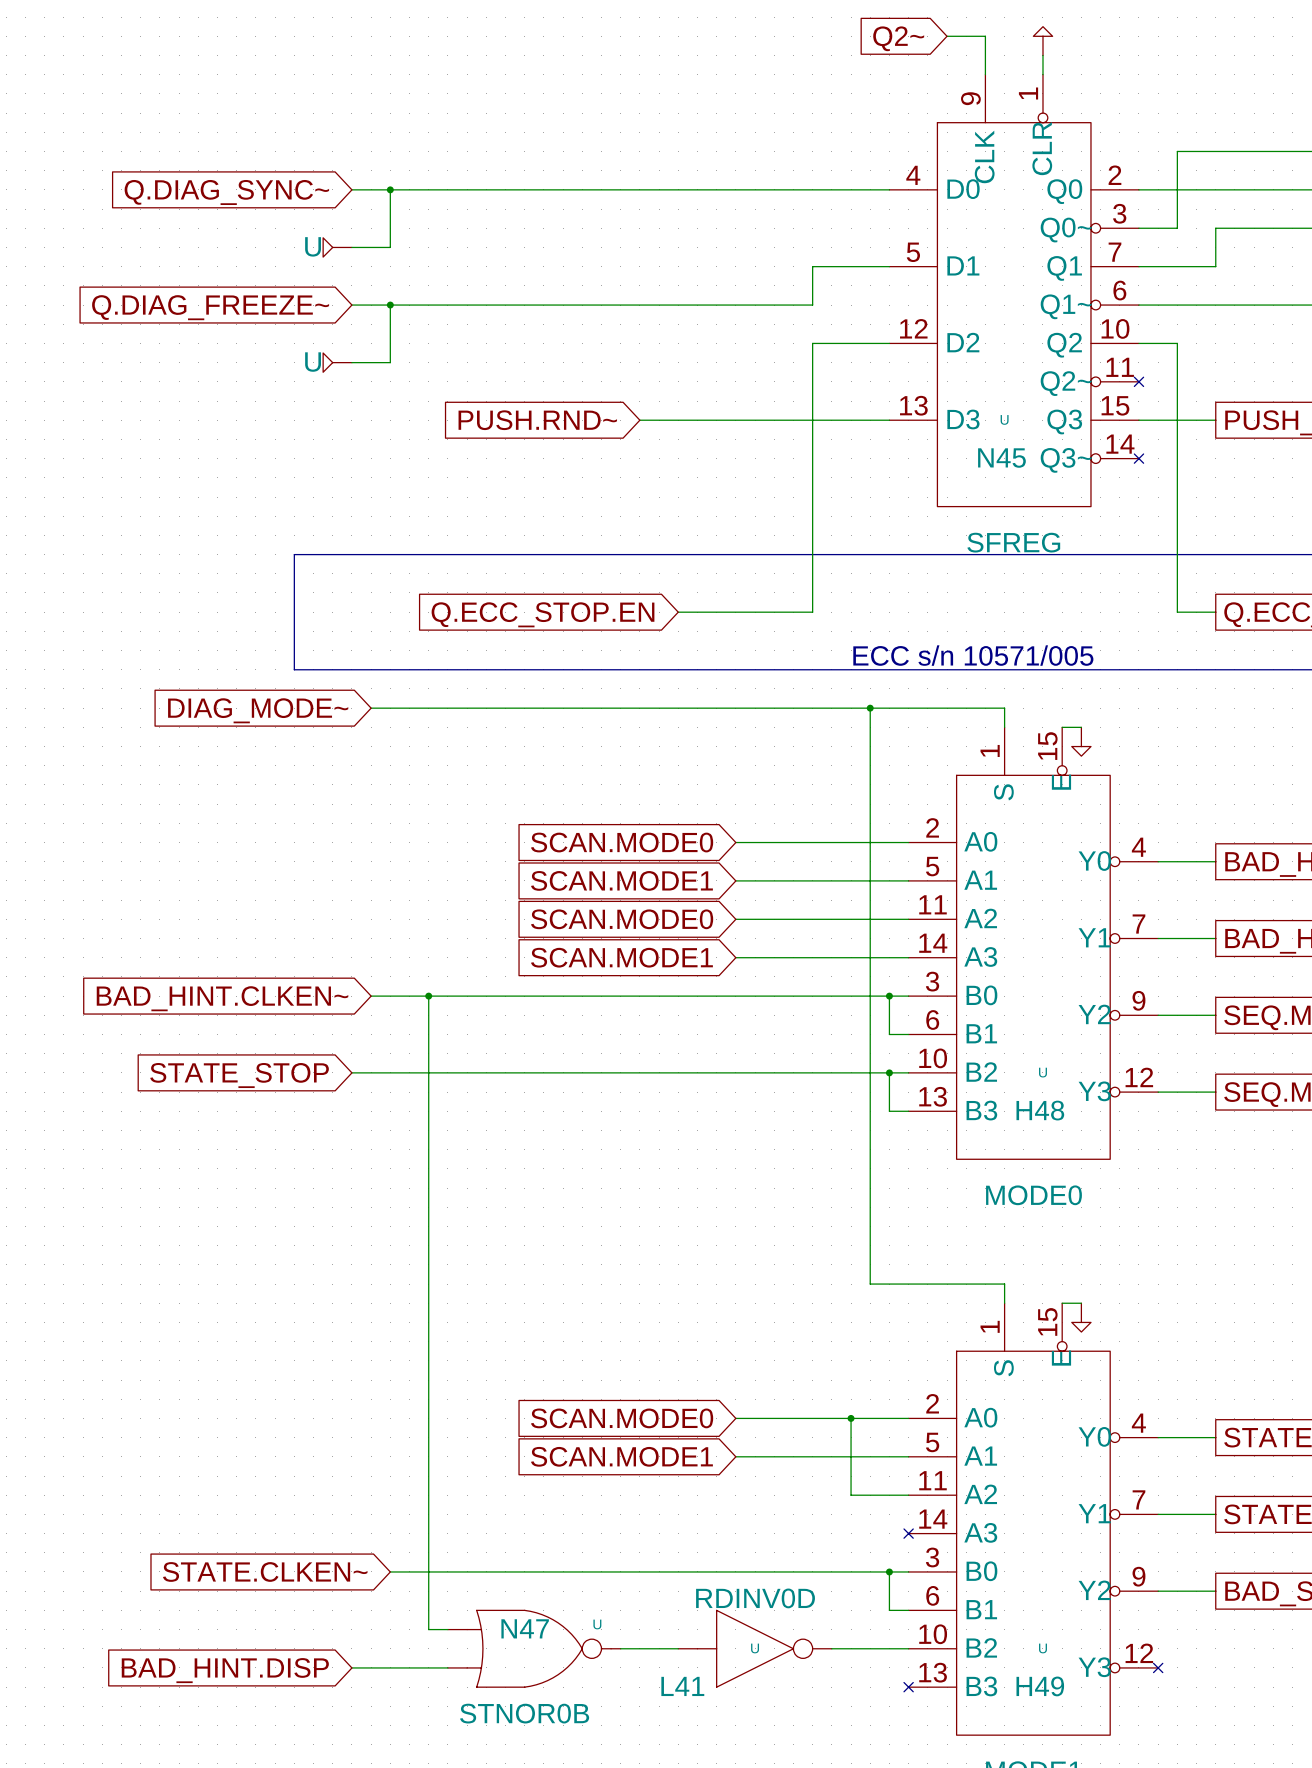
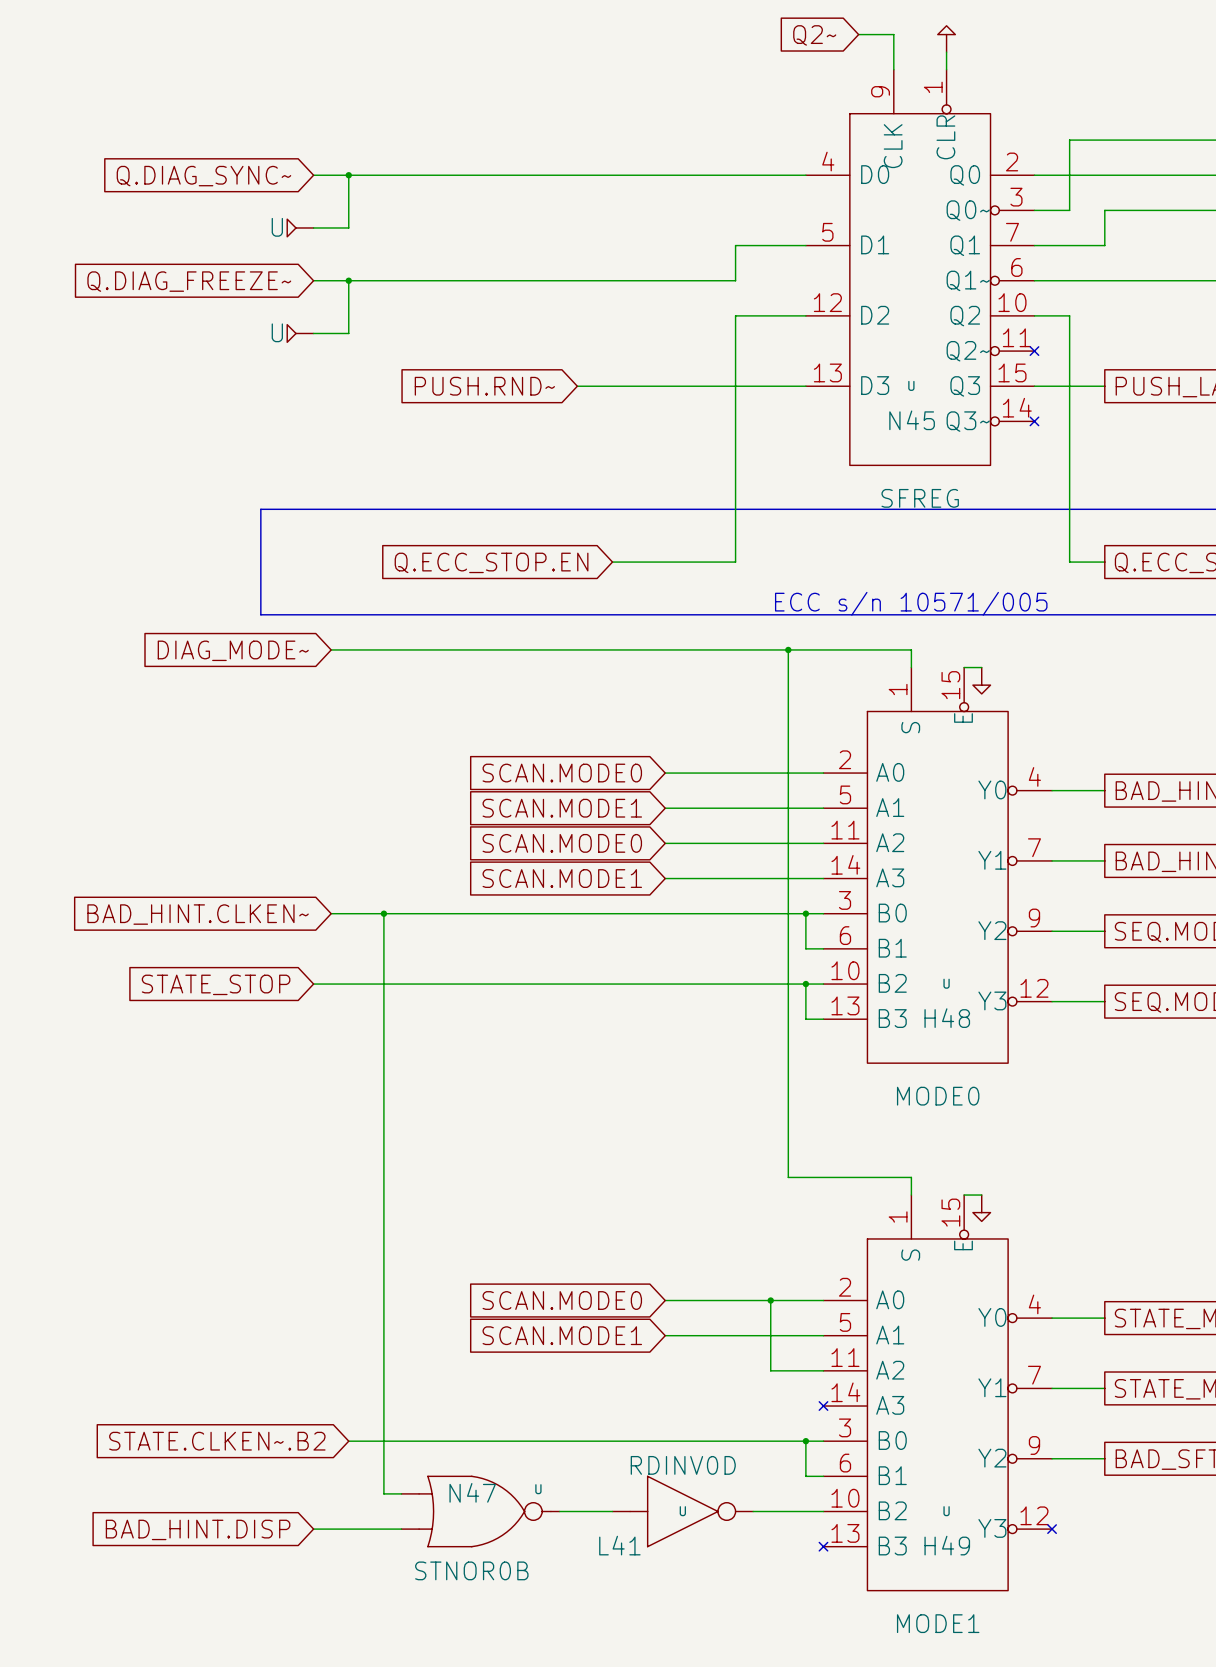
global label: STATE.CLKEN~ (265, 1571) -> STATE.CLKEN~.B2 (217, 1441)

